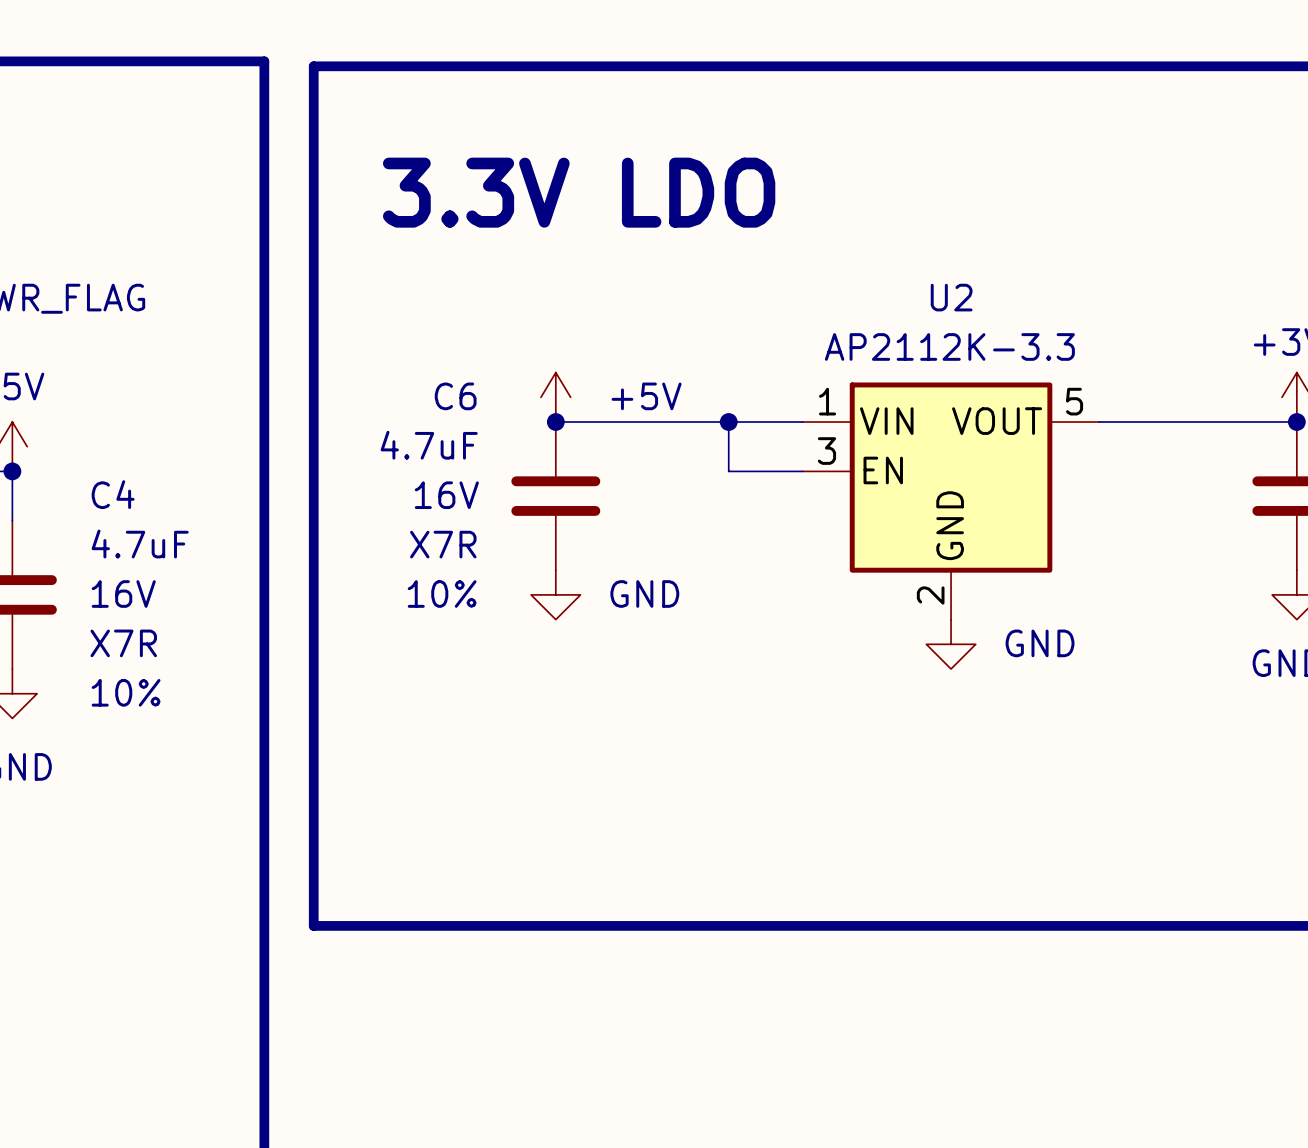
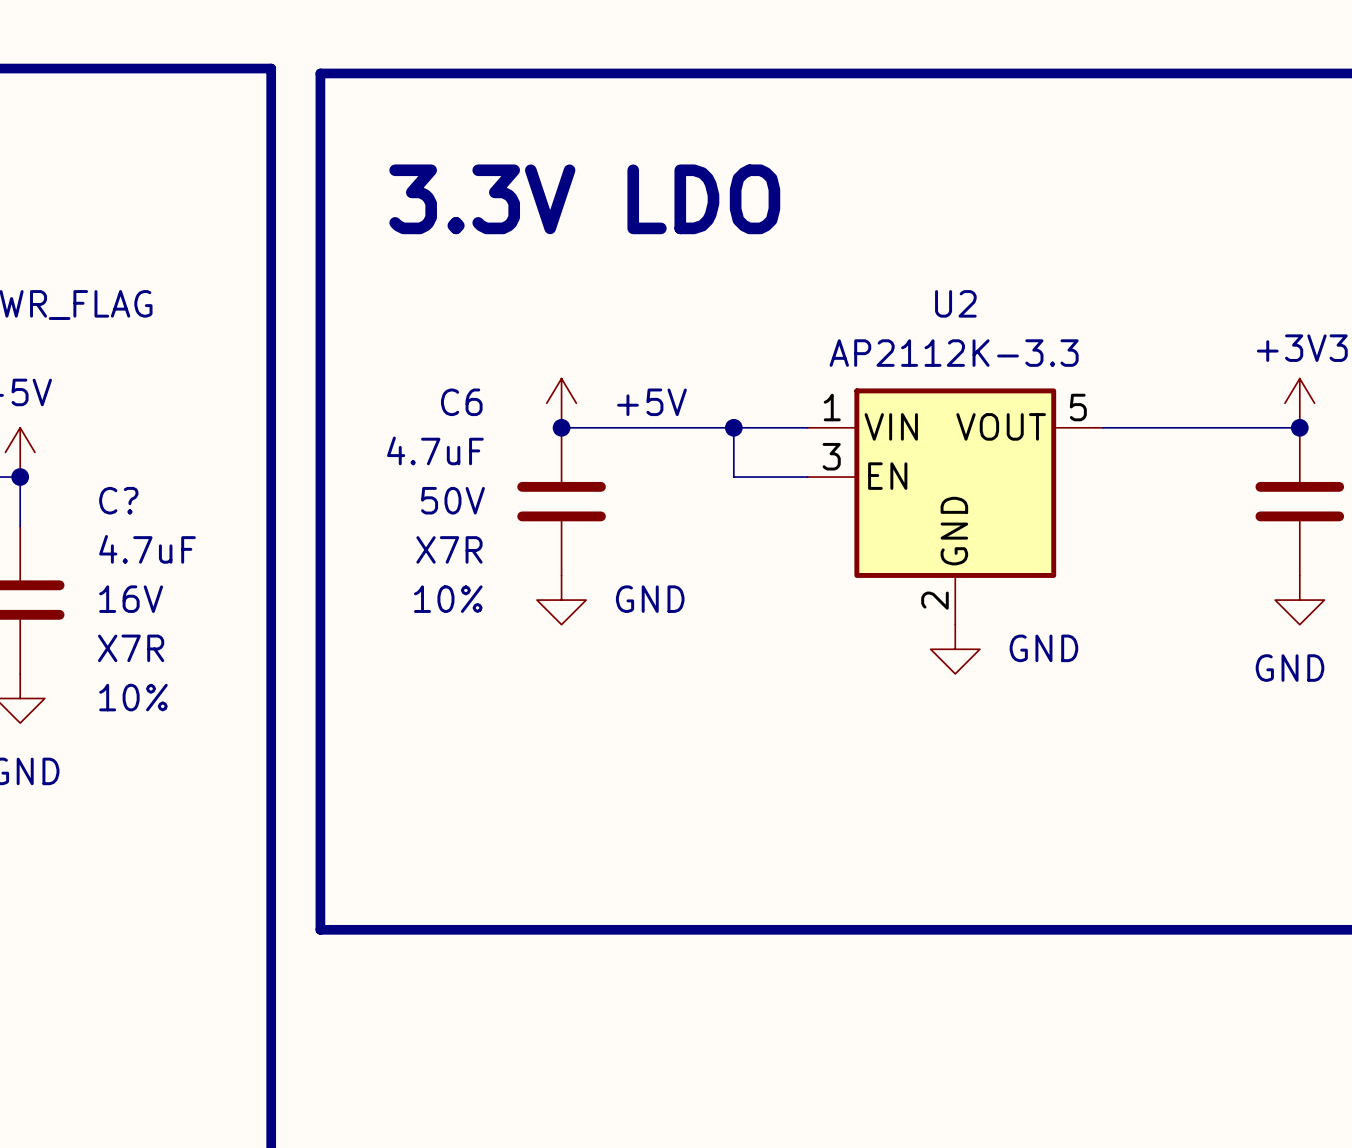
C4 name: C4 (113, 494) -> C? (118, 500)
C6 text: 16V (446, 495) -> 50V (452, 500)

